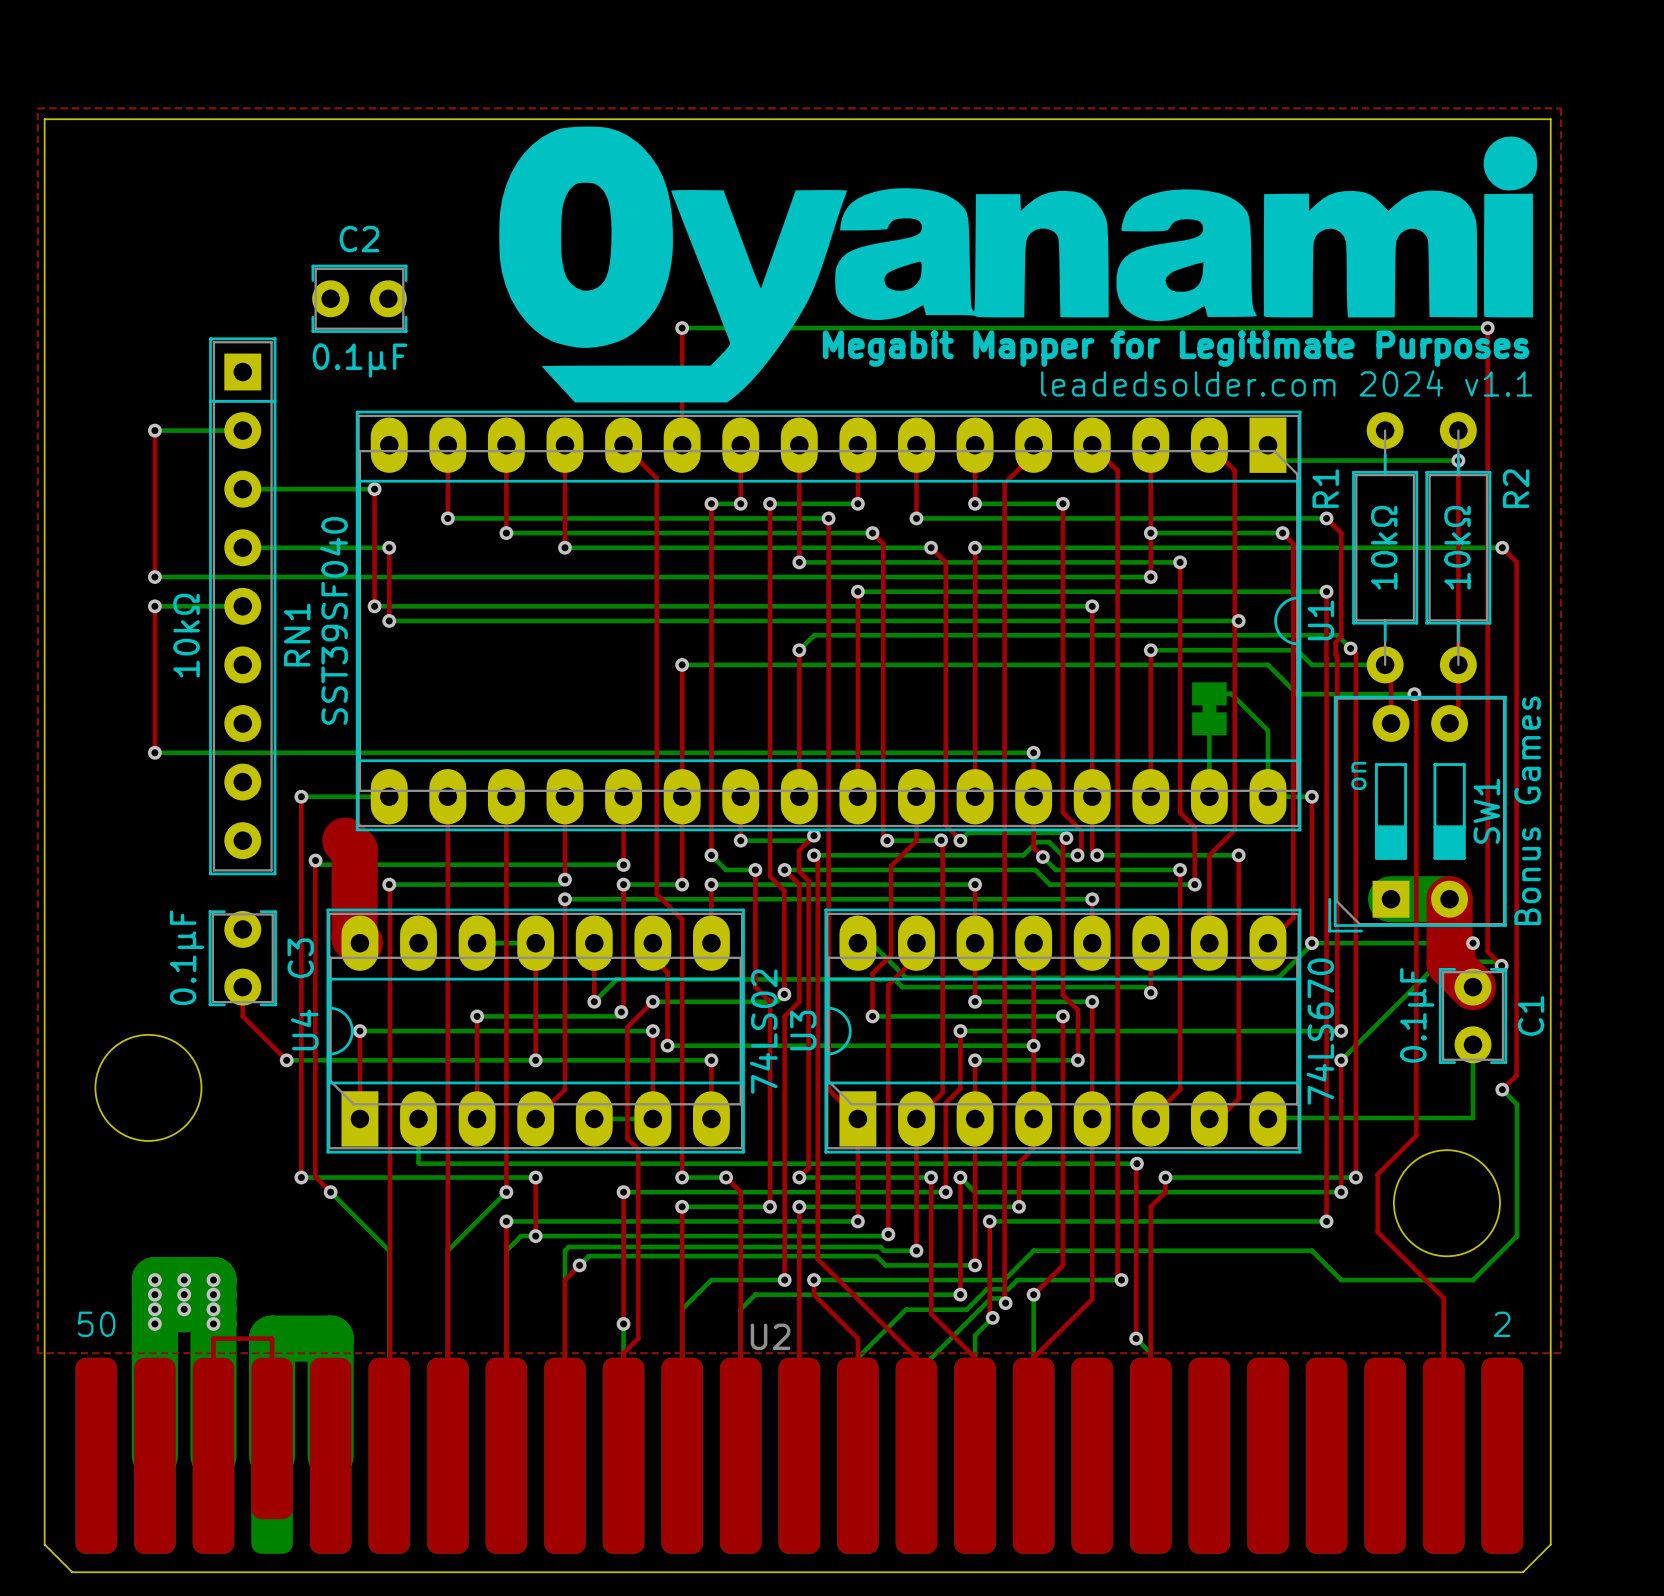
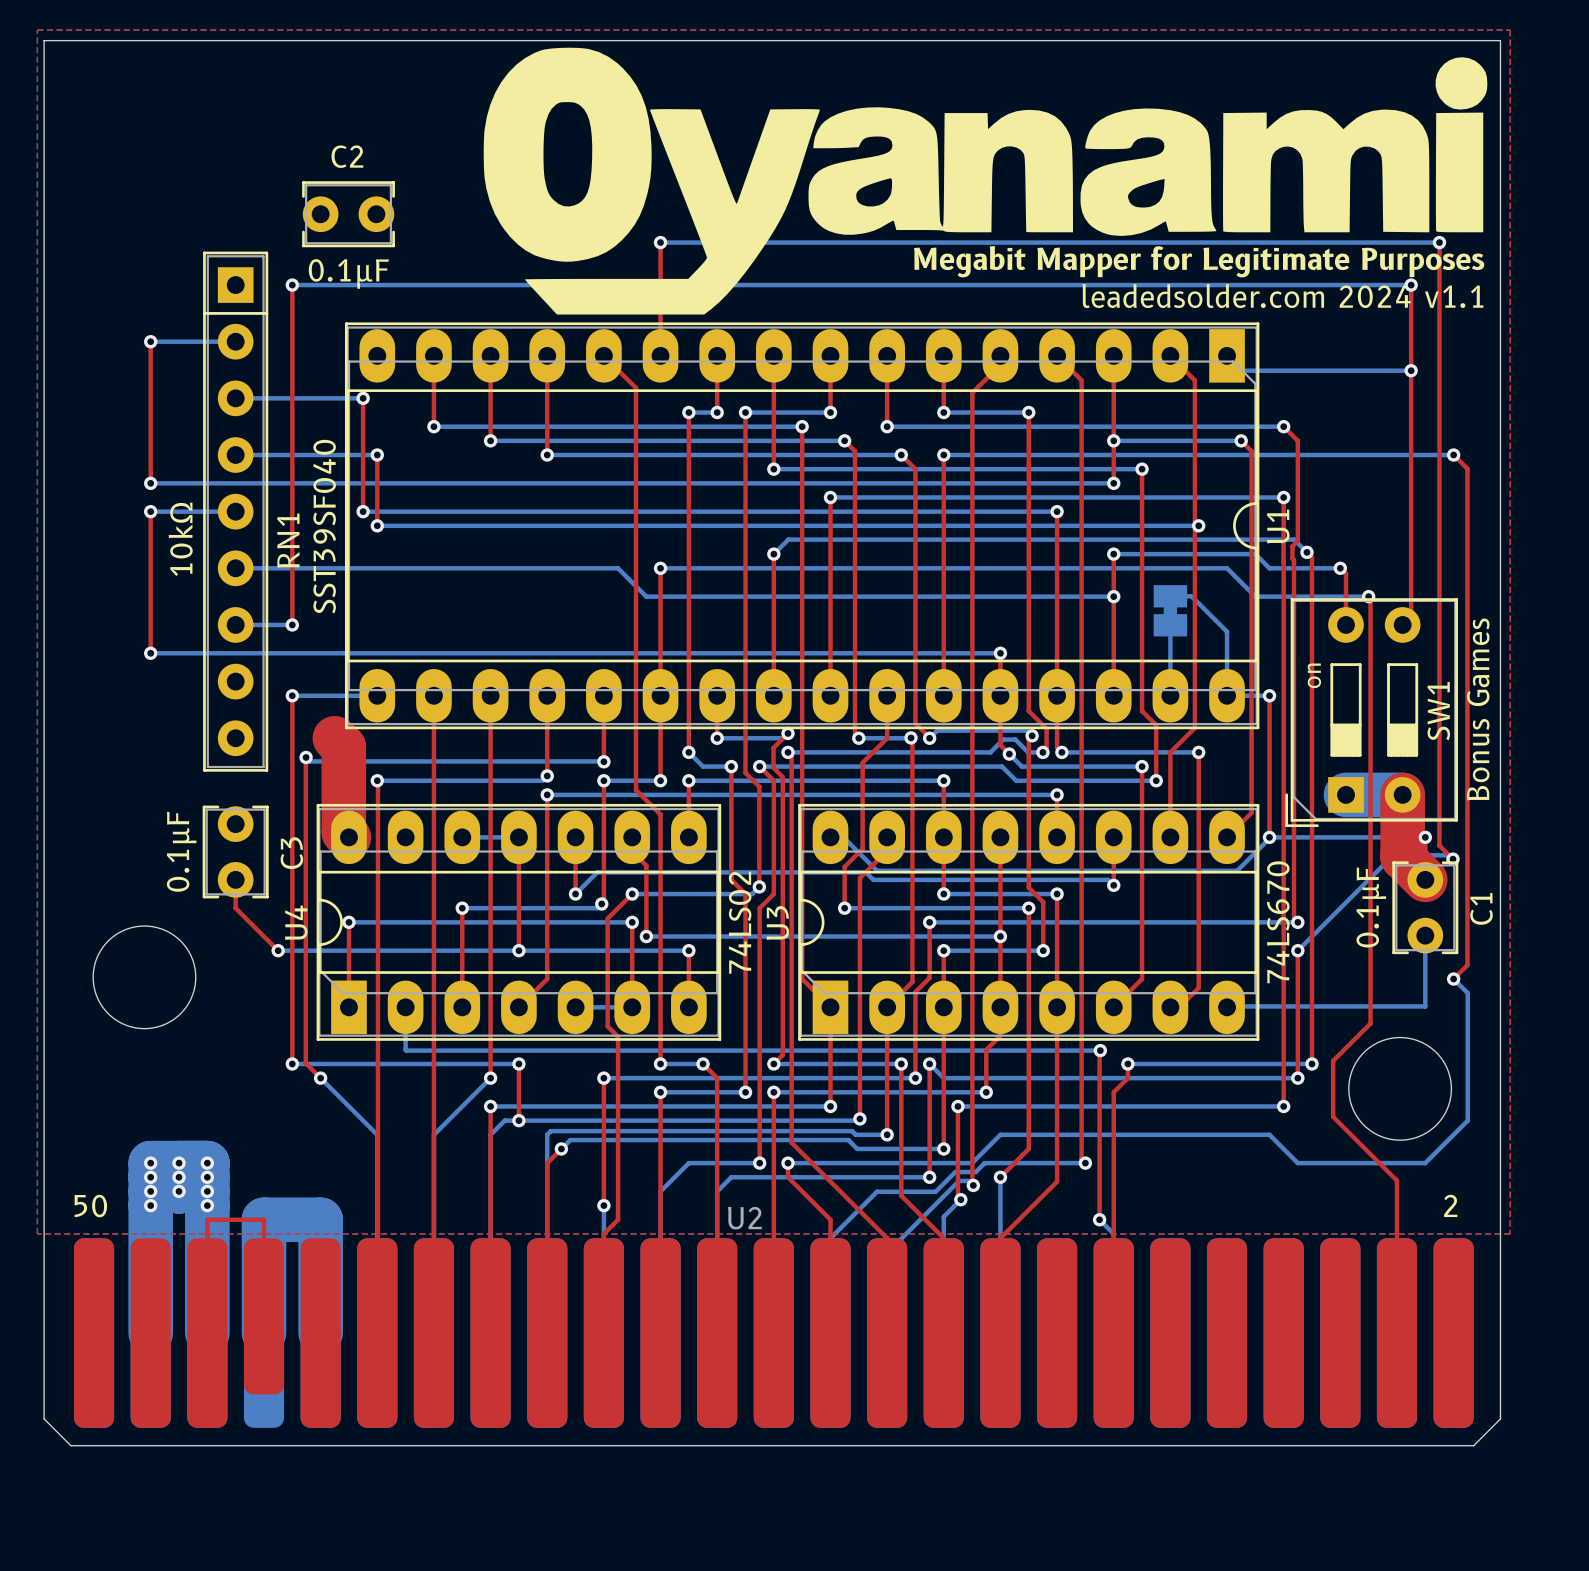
bottom track: none -> (292, 285) (1411, 285)
top track: none -> (292, 285) (292, 624)
via: none -> (292, 285)
top track: none -> (1411, 285) (1411, 370)
via: none -> (1411, 285)
R1: 10kΩ (1385, 547) -> none
R2: 10kΩ (1458, 547) -> none
bottom track: none -> (235, 568) (618, 568) (646, 596) (1113, 596)
via: none -> (1340, 568)
via: none -> (1113, 596)
bottom track: none -> (235, 624) (292, 624)
via: none -> (292, 624)

